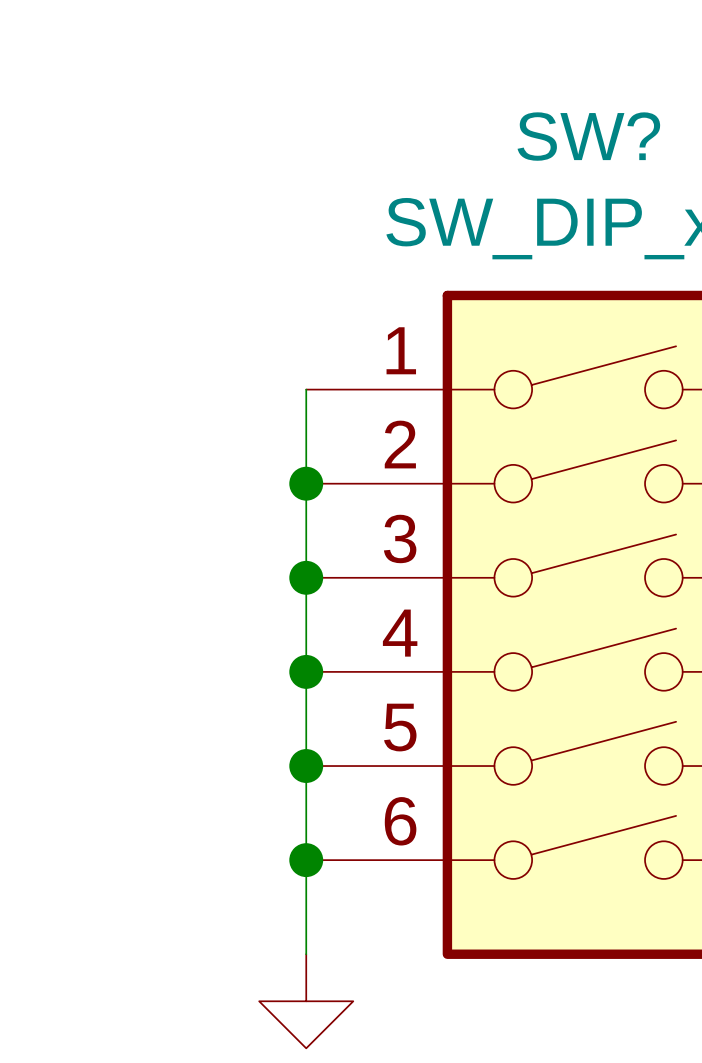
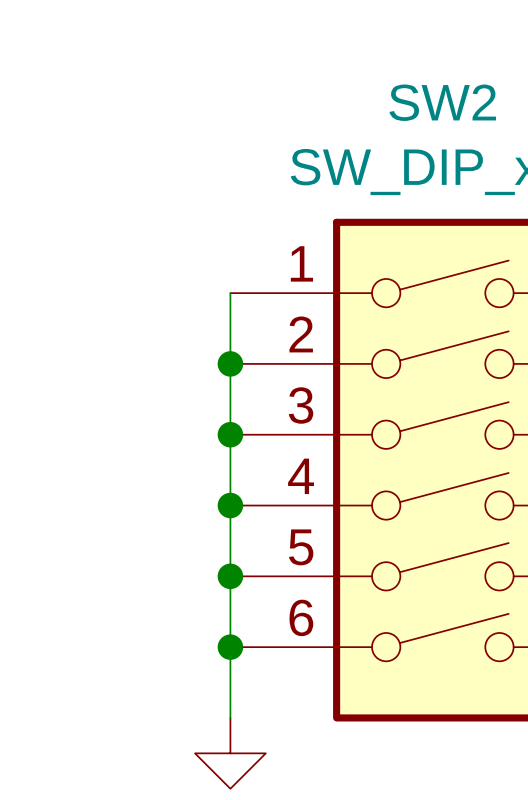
SW? name: SW? (588, 136) -> SW2 (442, 102)

